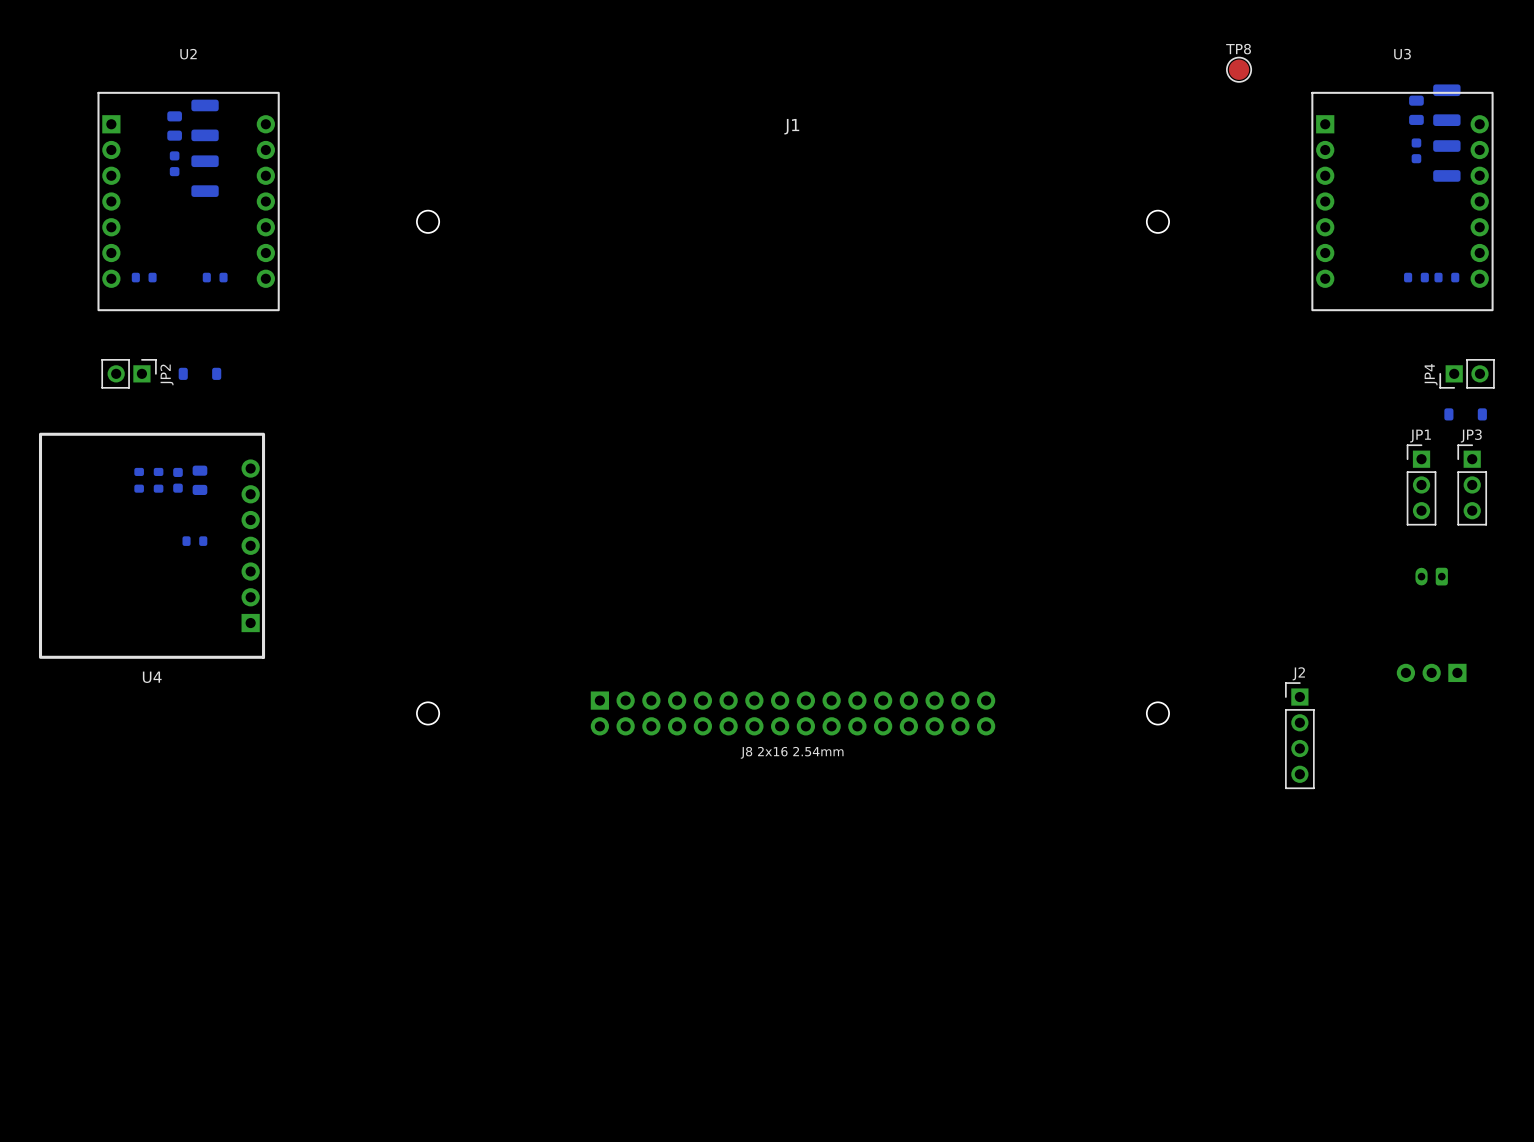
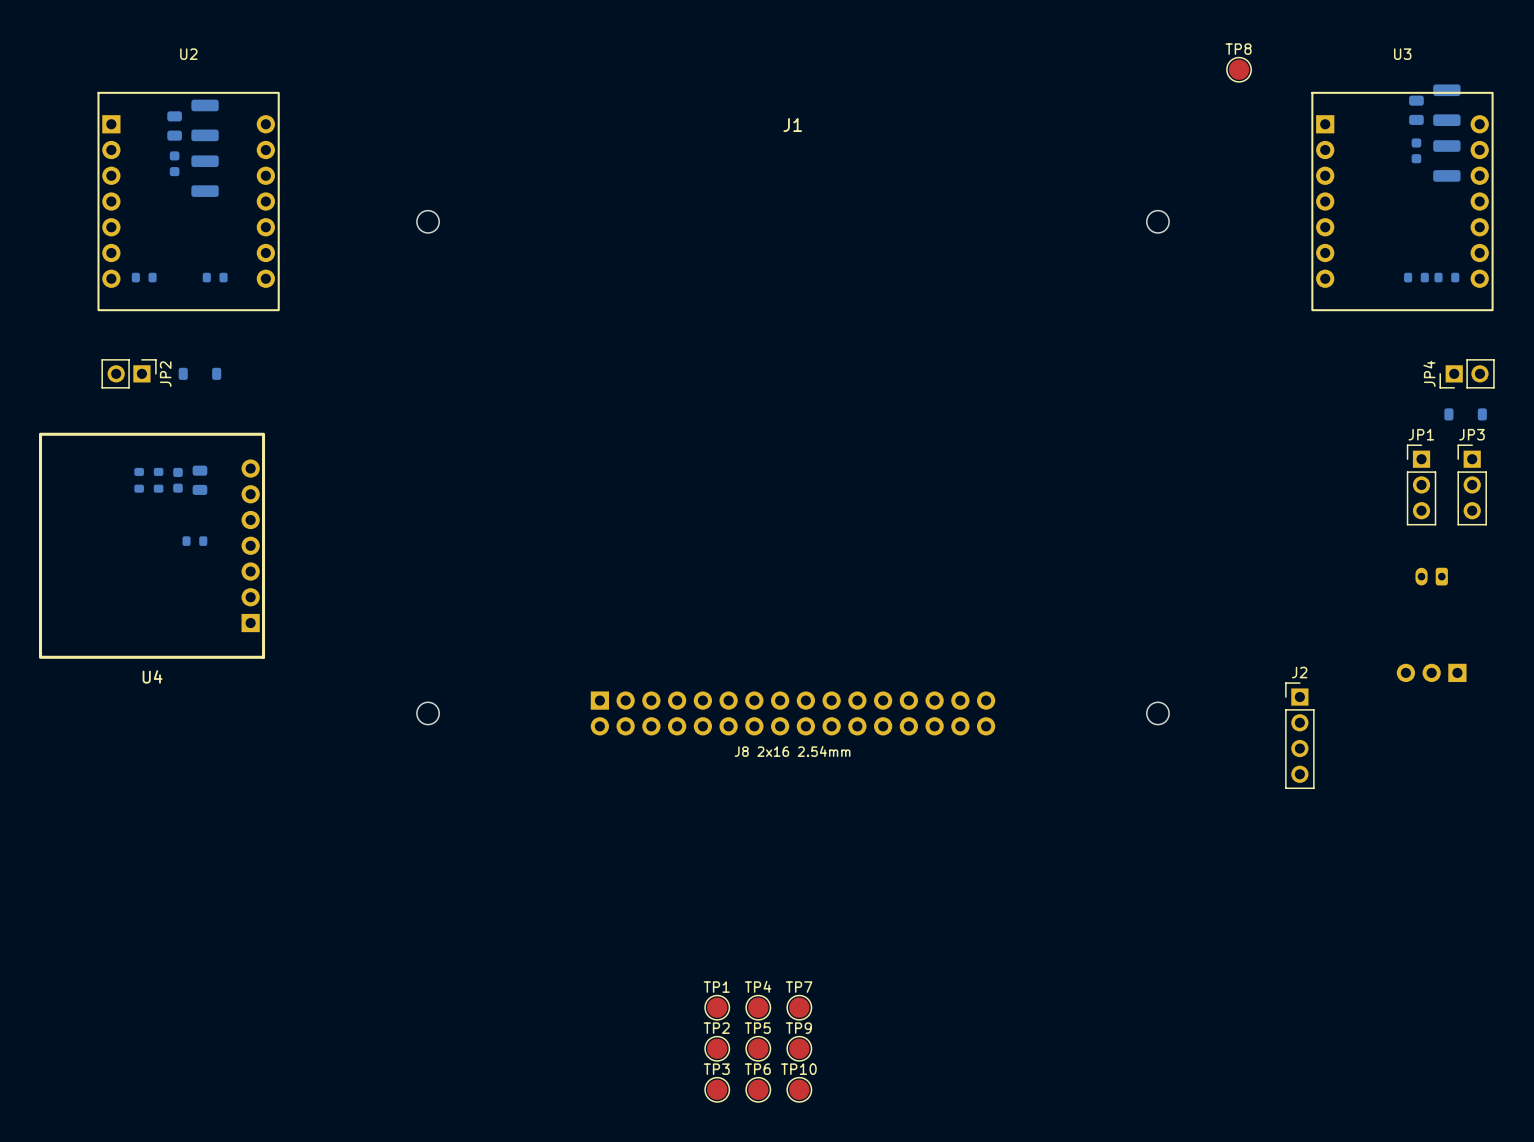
TP1: none -> (717, 1007)
TP4: none -> (758, 1007)
TP7: none -> (799, 1007)
TP2: none -> (717, 1048)
TP5: none -> (758, 1048)
TP9: none -> (799, 1048)
TP3: none -> (717, 1089)
TP6: none -> (758, 1089)
TP10: none -> (799, 1089)

